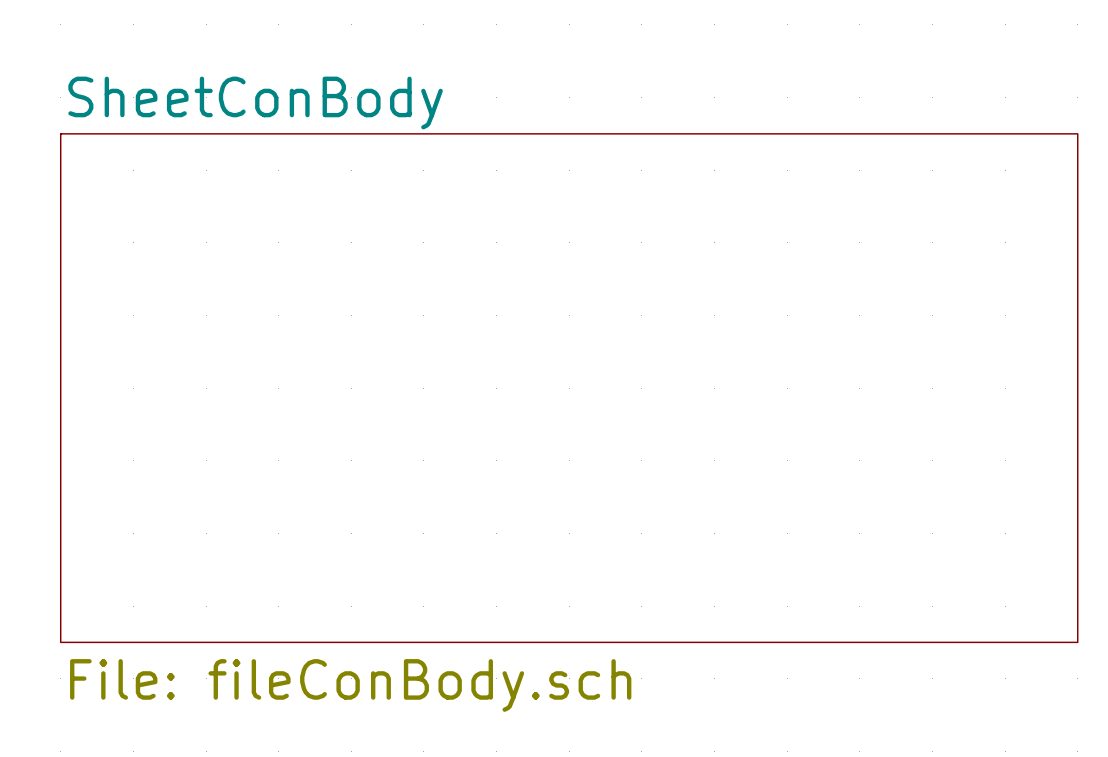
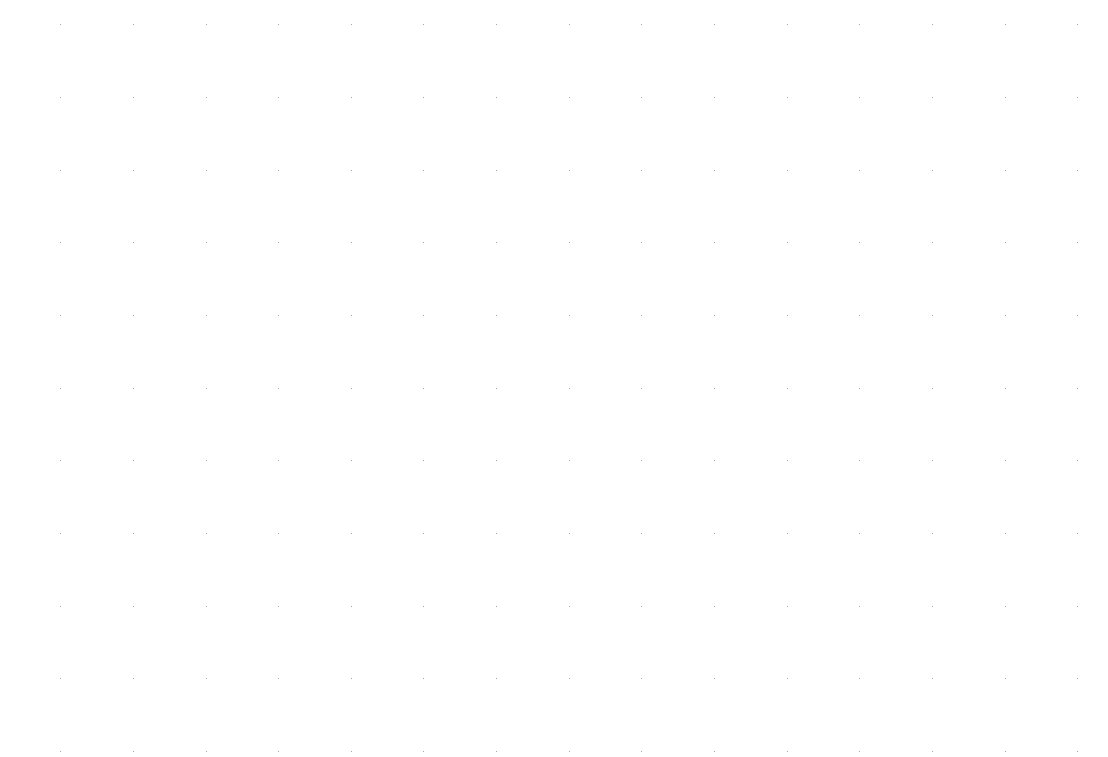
sheet SheetConBody: File: fileConBody.sch (569, 388) -> none

